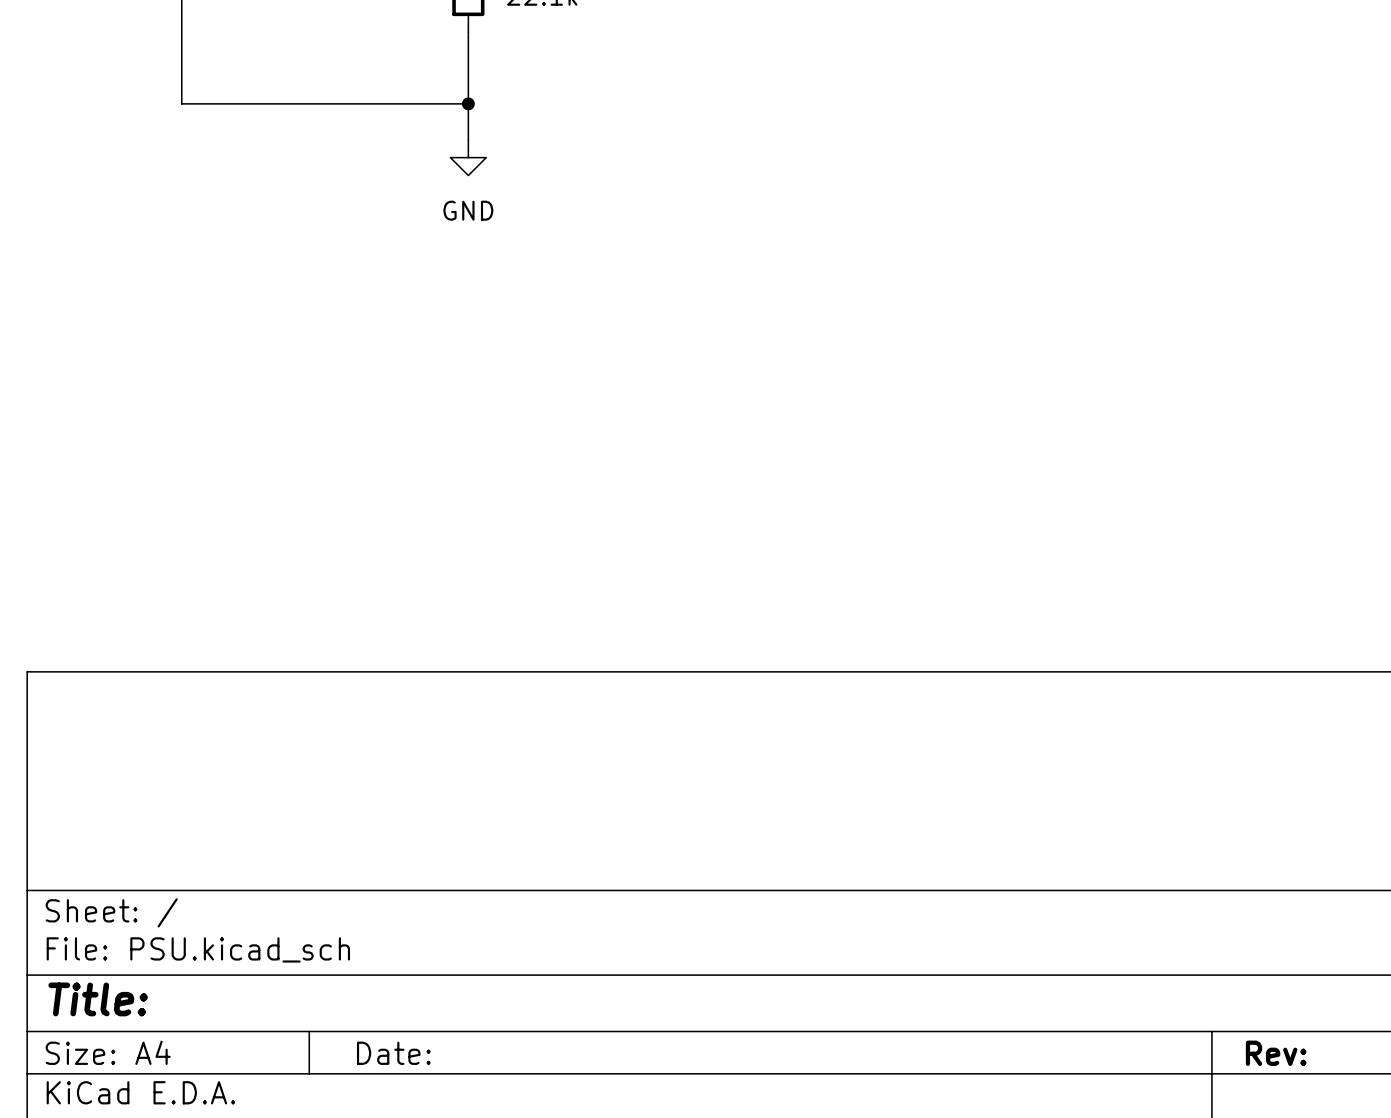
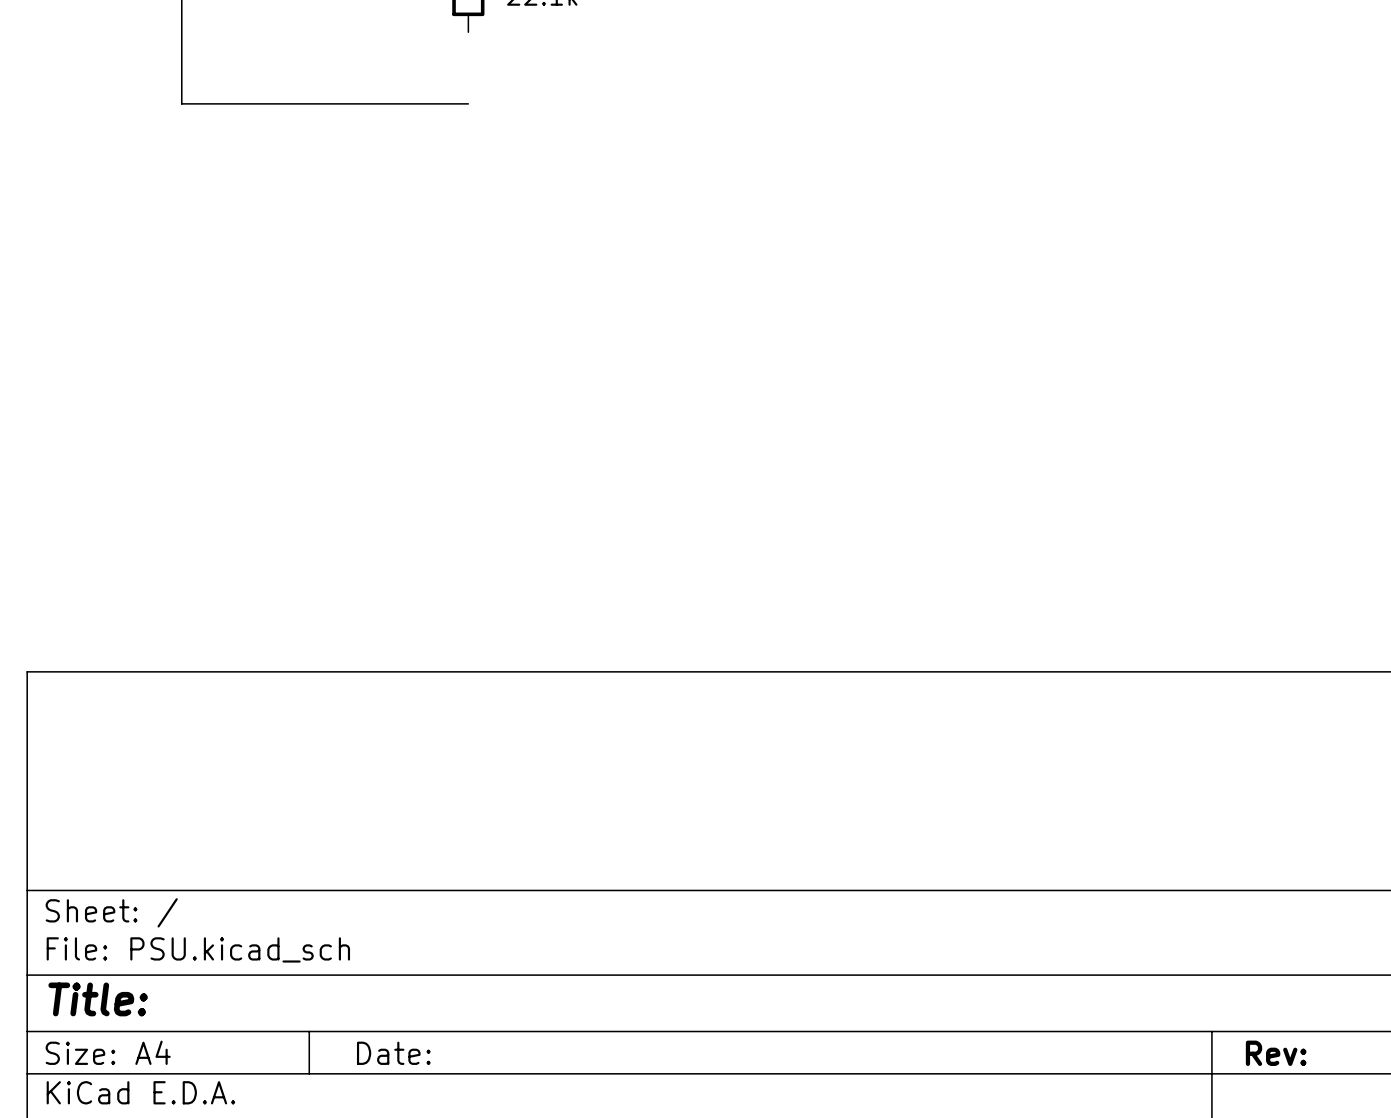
wire: (468, 32) (468, 139) -> none
junction: (468, 103) -> none
power symbol: GND (468, 157) -> none

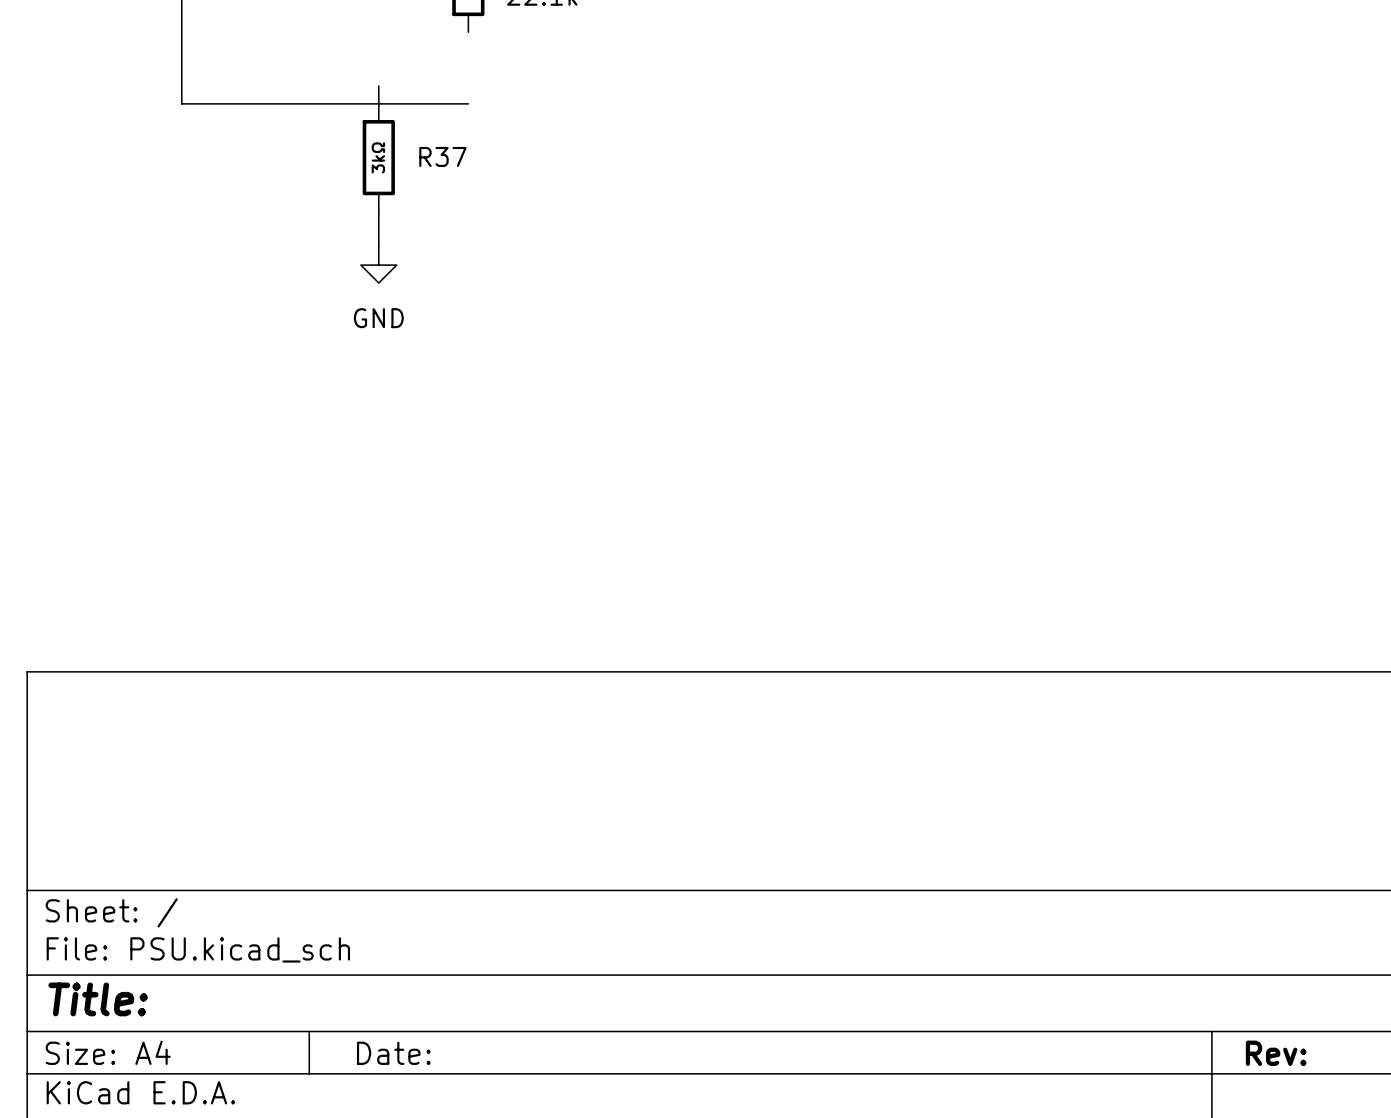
wire: none -> (378, 85) (378, 103)
R37: none -> 3kΩ (378, 157)
wire: none -> (378, 211) (378, 247)
power symbol: none -> GND (378, 265)

